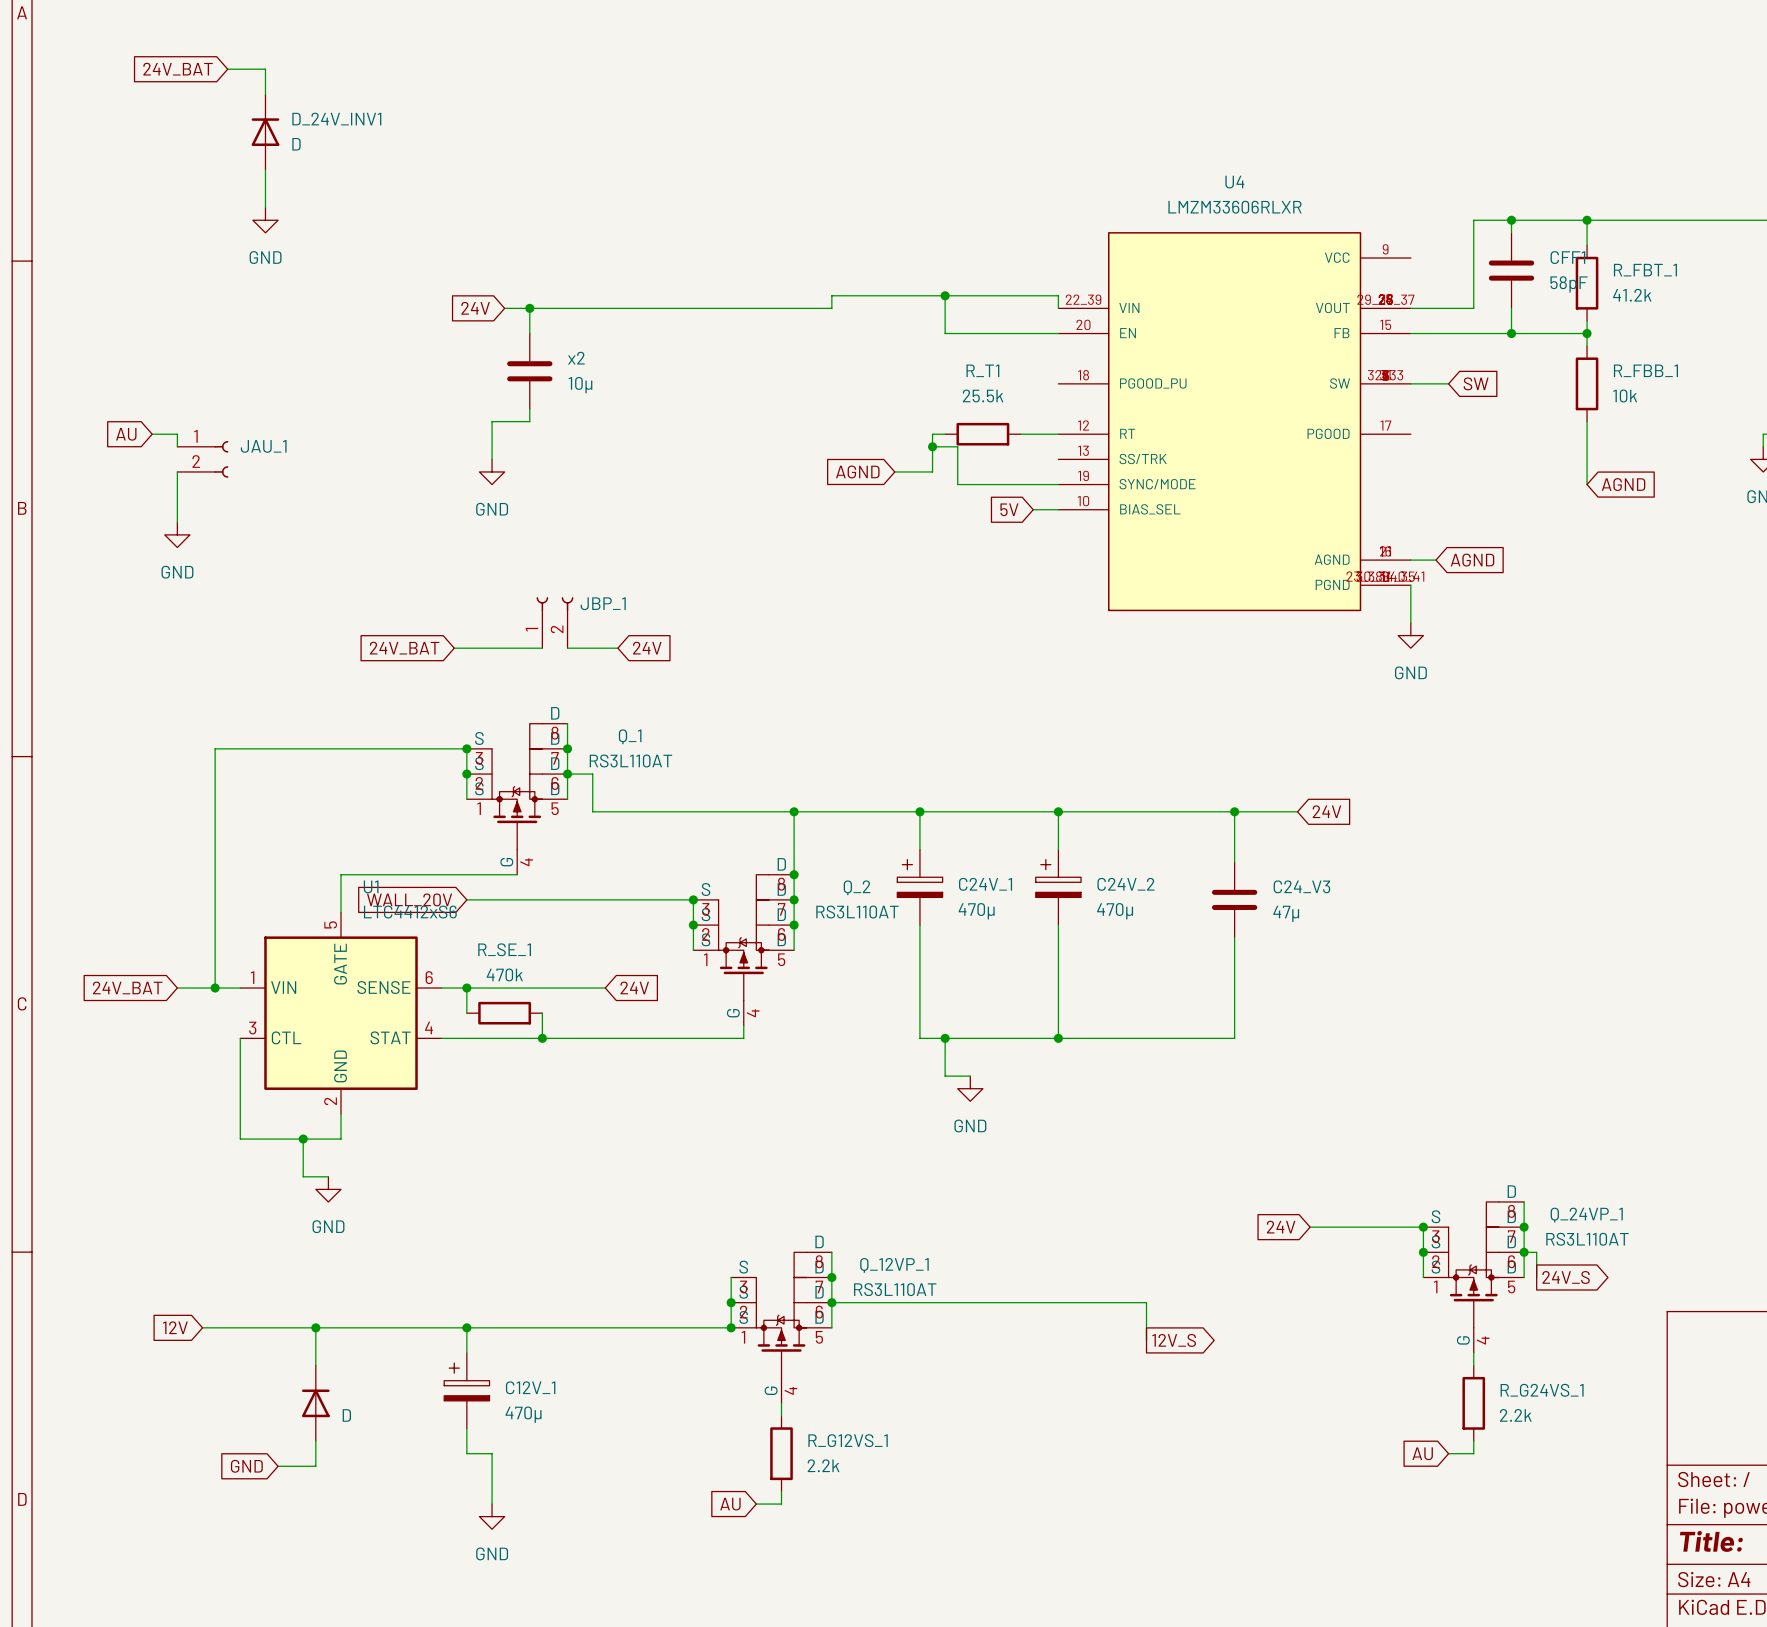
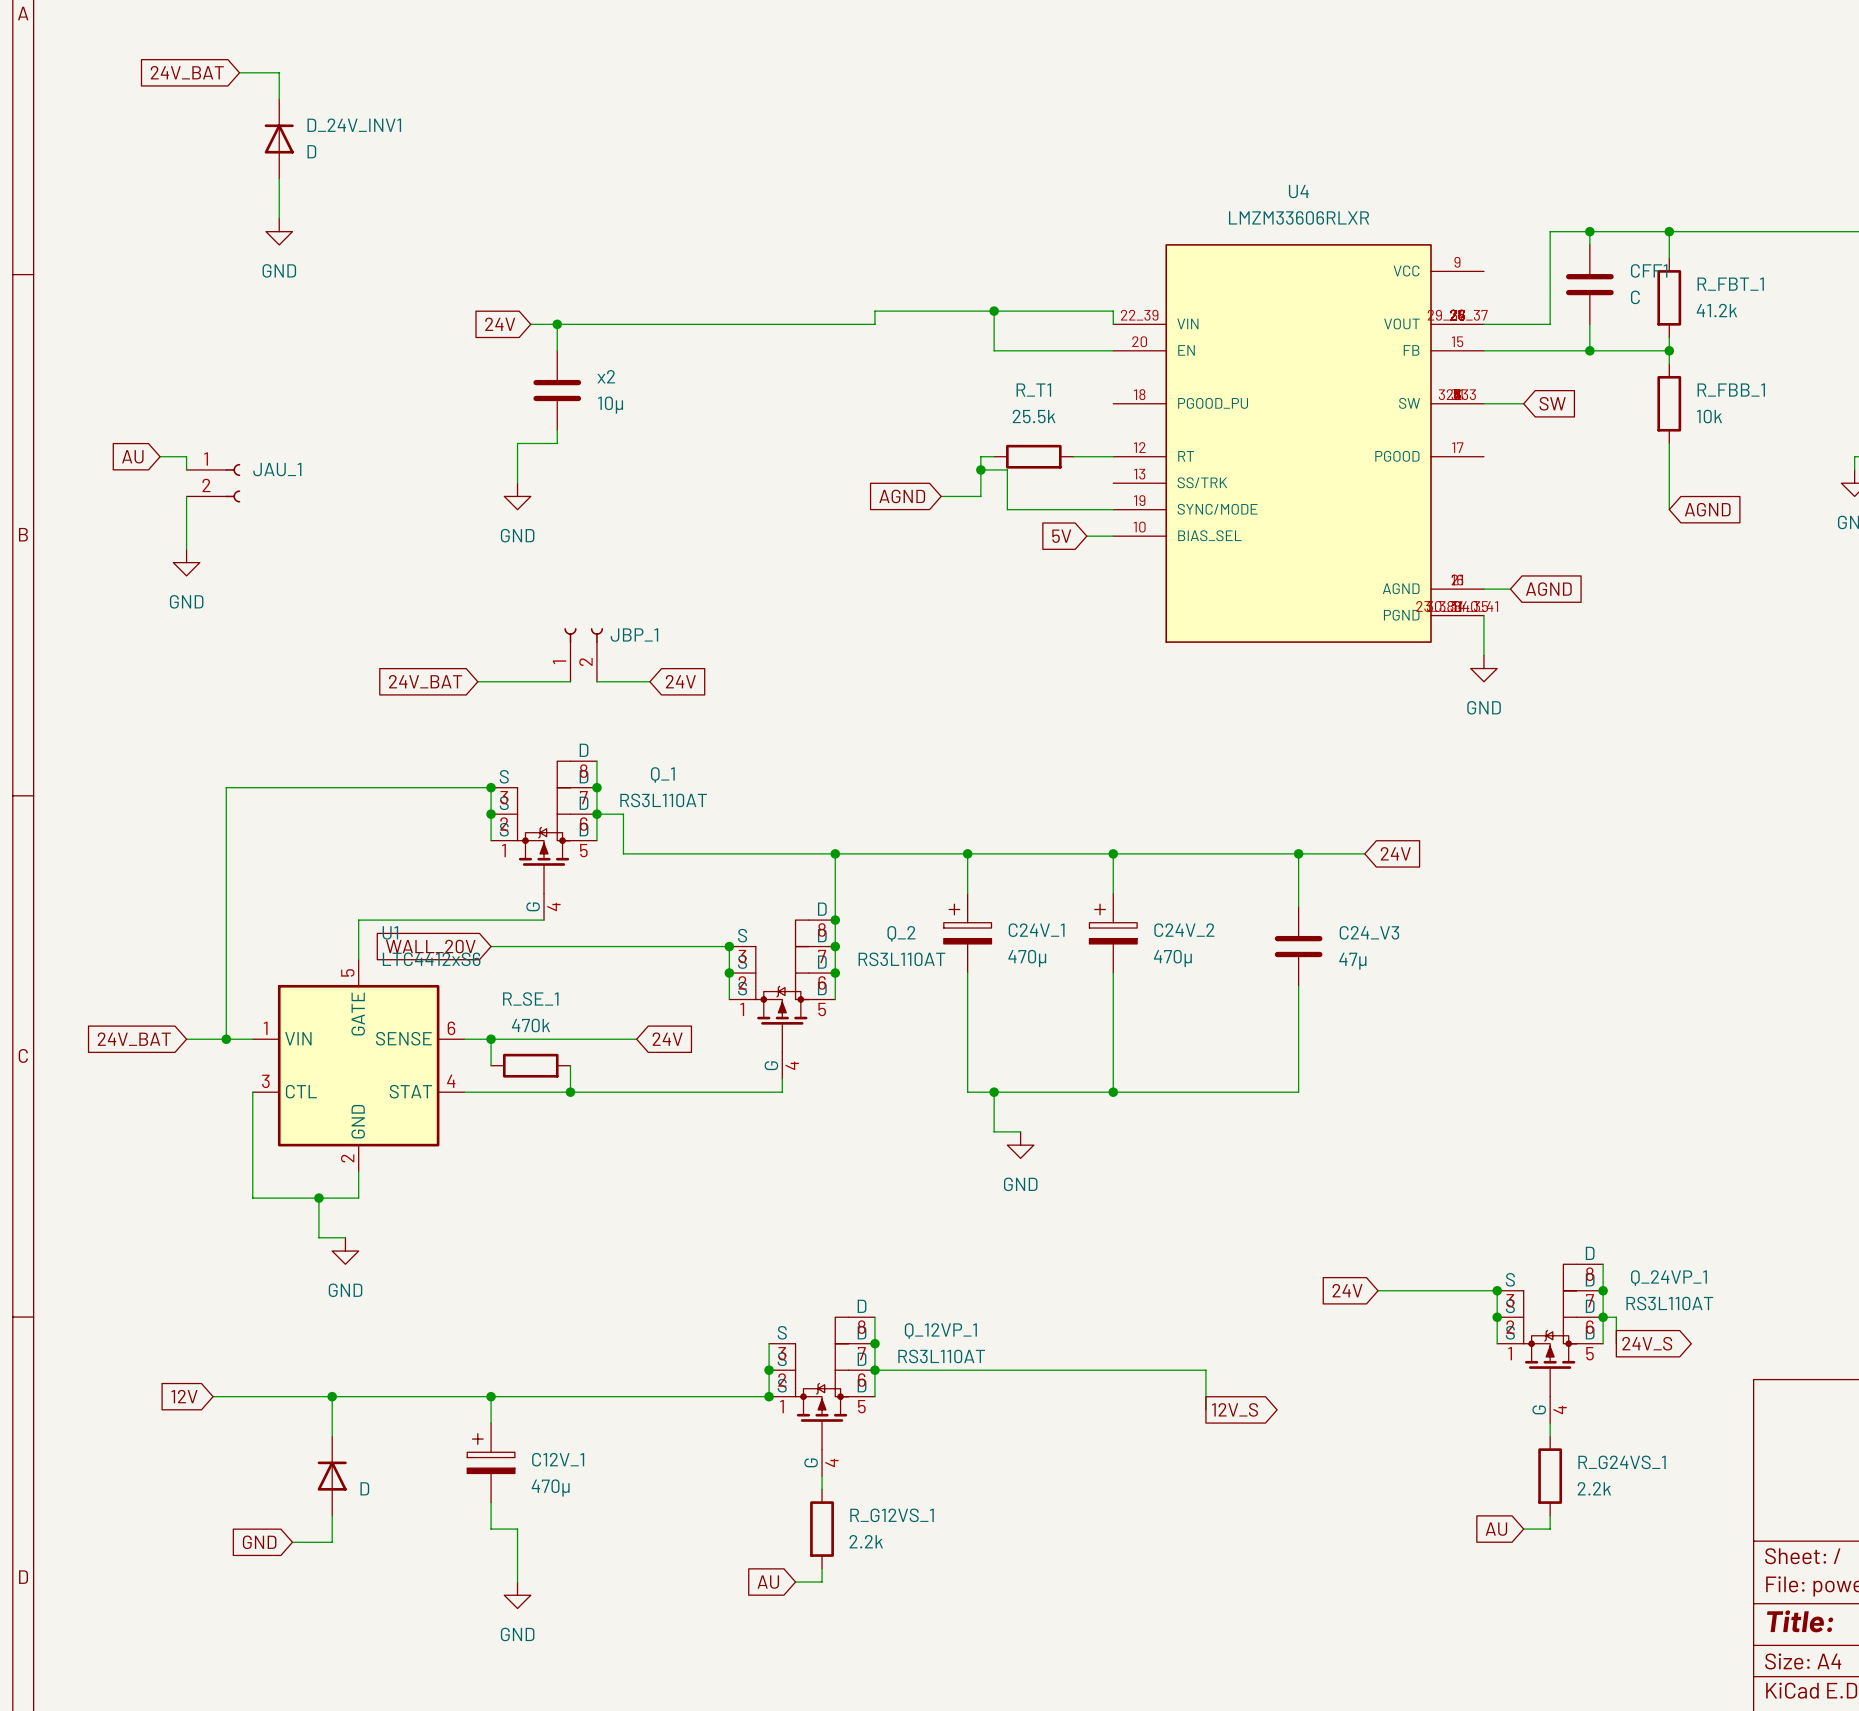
CFF1 value: 58pF (1569, 284) -> C (1635, 297)

